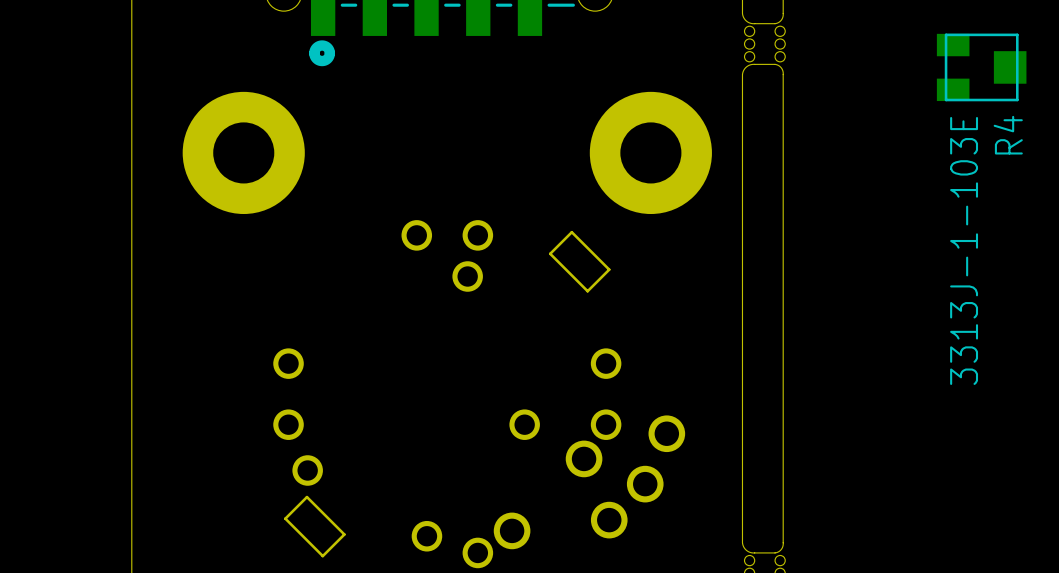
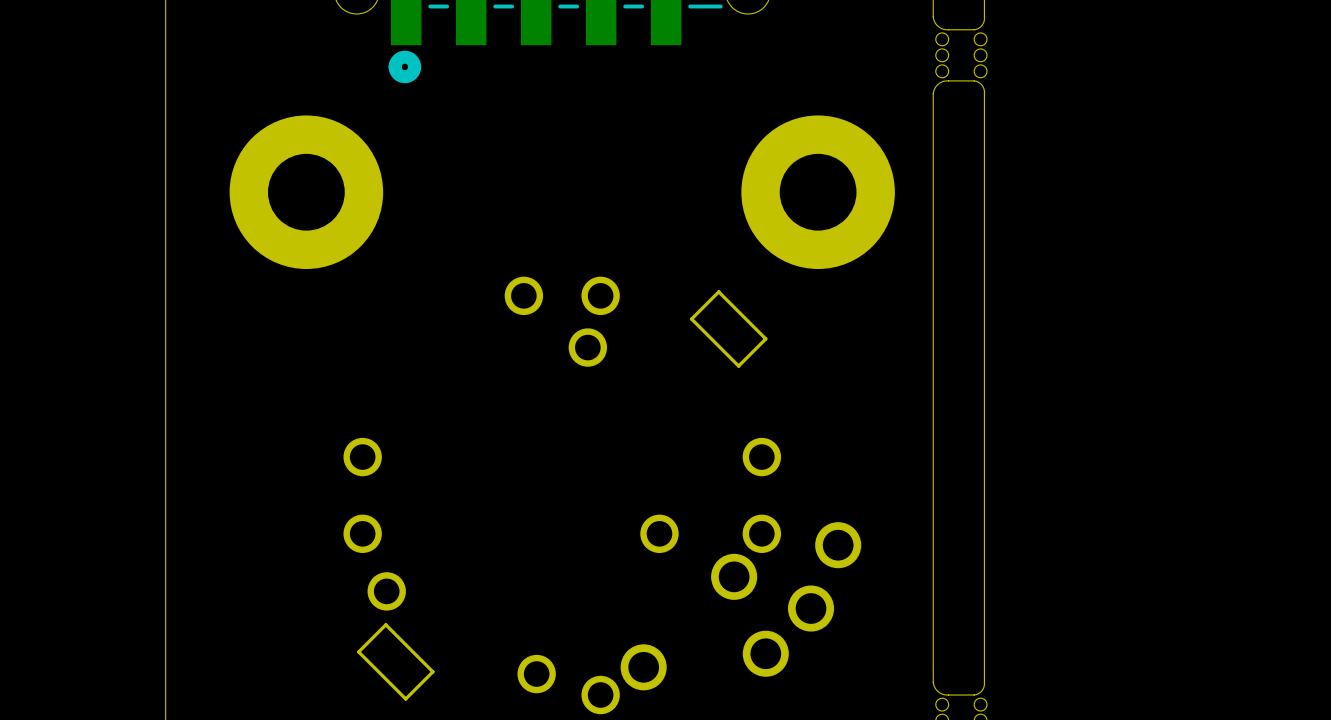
R4: 3313J-1-103E (981, 67) -> none

